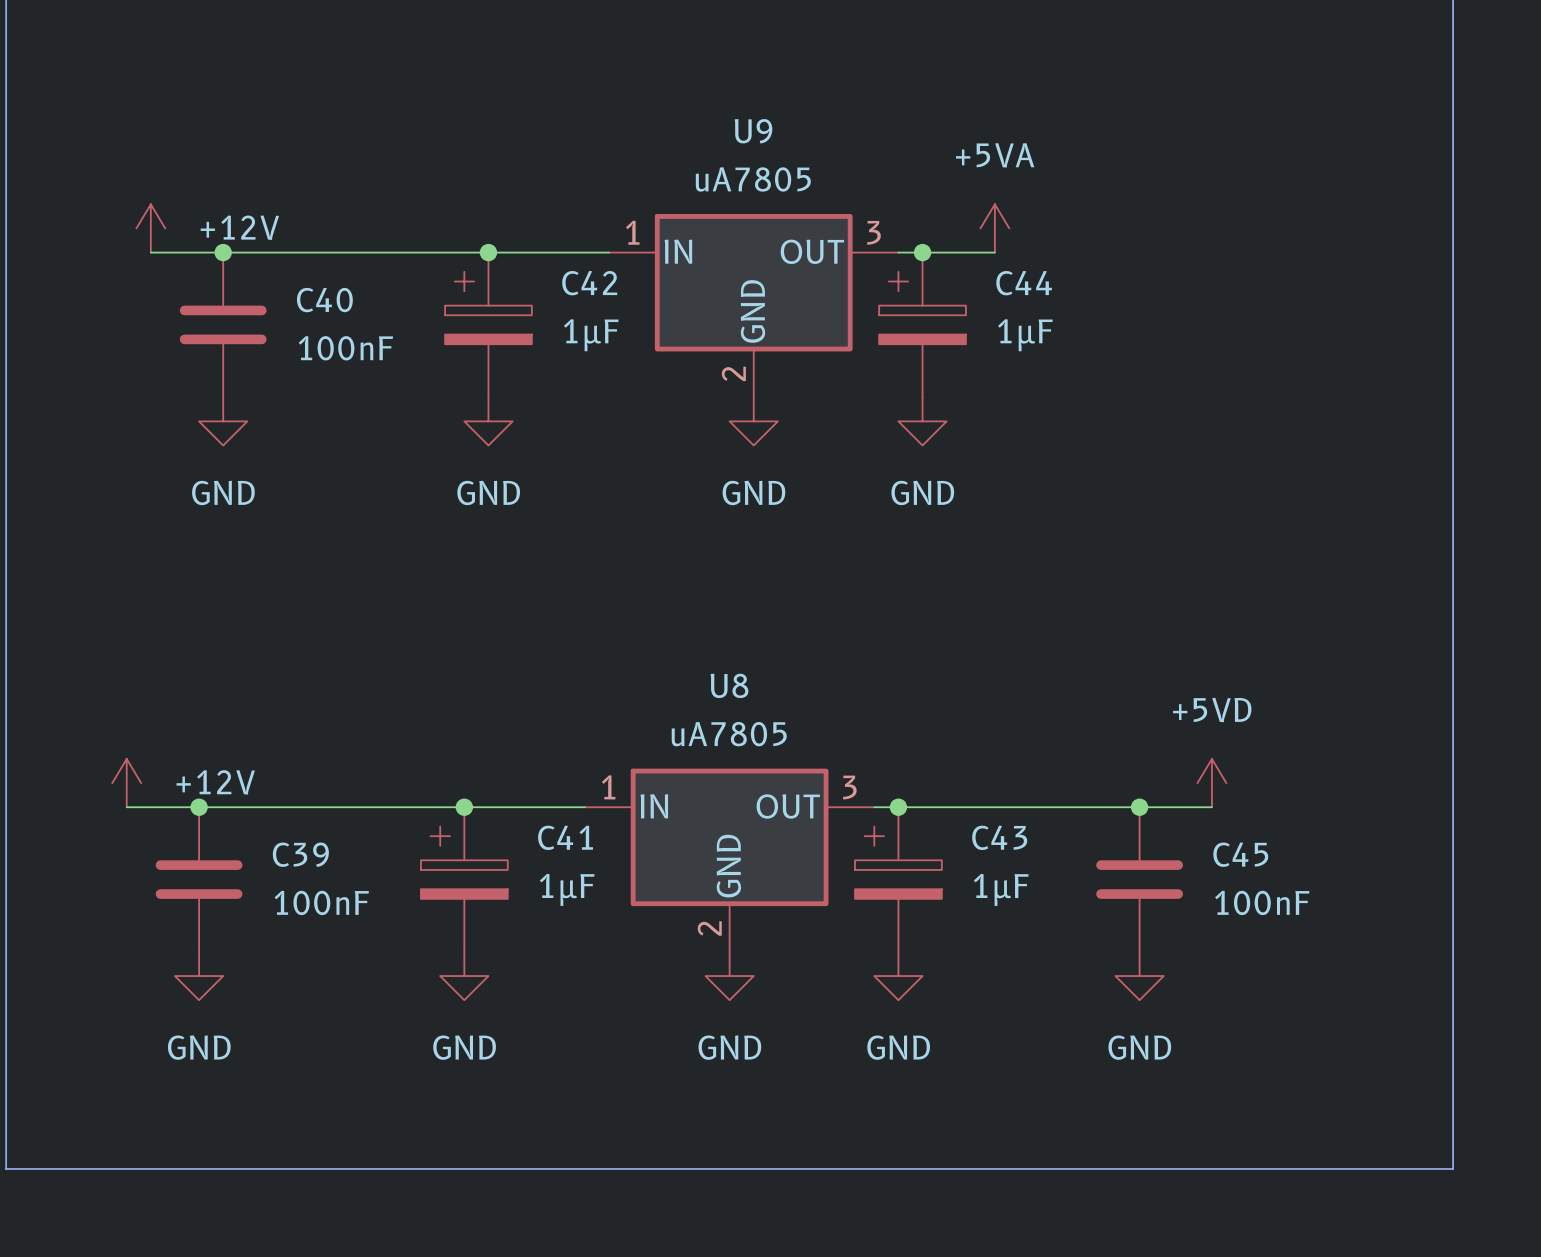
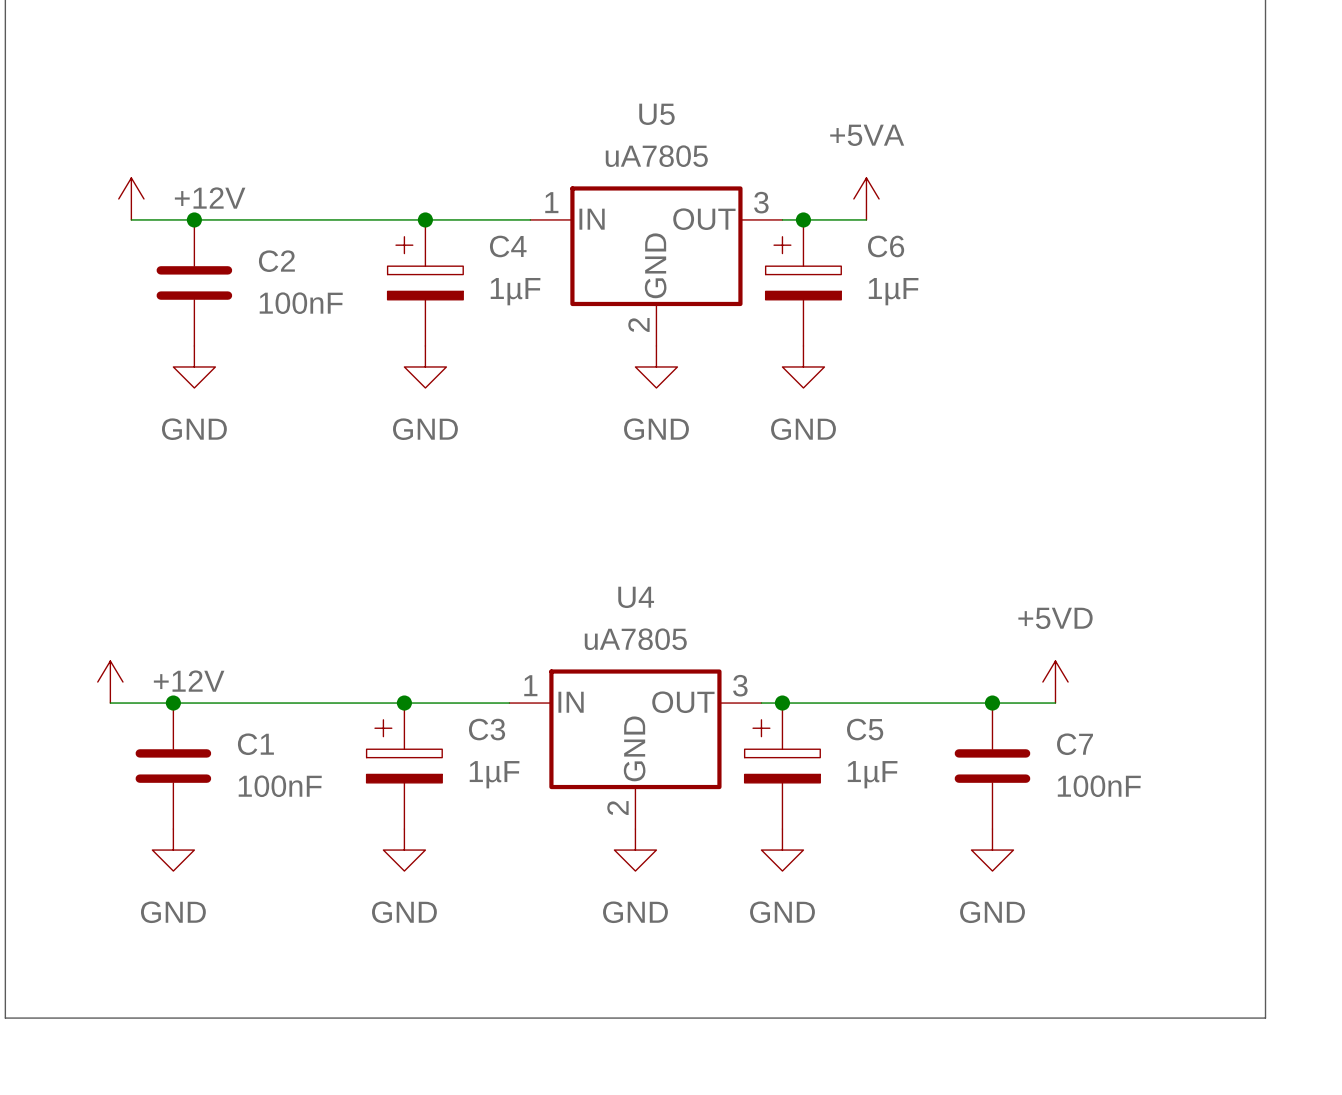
U9 name: U9 (753, 131) -> U5 (656, 114)
C42 name: C42 (589, 283) -> C4 (508, 246)
C44 name: C44 (1024, 283) -> C6 (886, 246)
C40 name: C40 (324, 300) -> C2 (276, 261)
U8 name: U8 (729, 685) -> U4 (636, 597)
C41 name: C41 (565, 837) -> C3 (487, 729)
C43 name: C43 (999, 837) -> C5 (865, 729)
C39 name: C39 (300, 854) -> C1 (255, 744)
C45 name: C45 (1240, 854) -> C7 (1075, 744)

